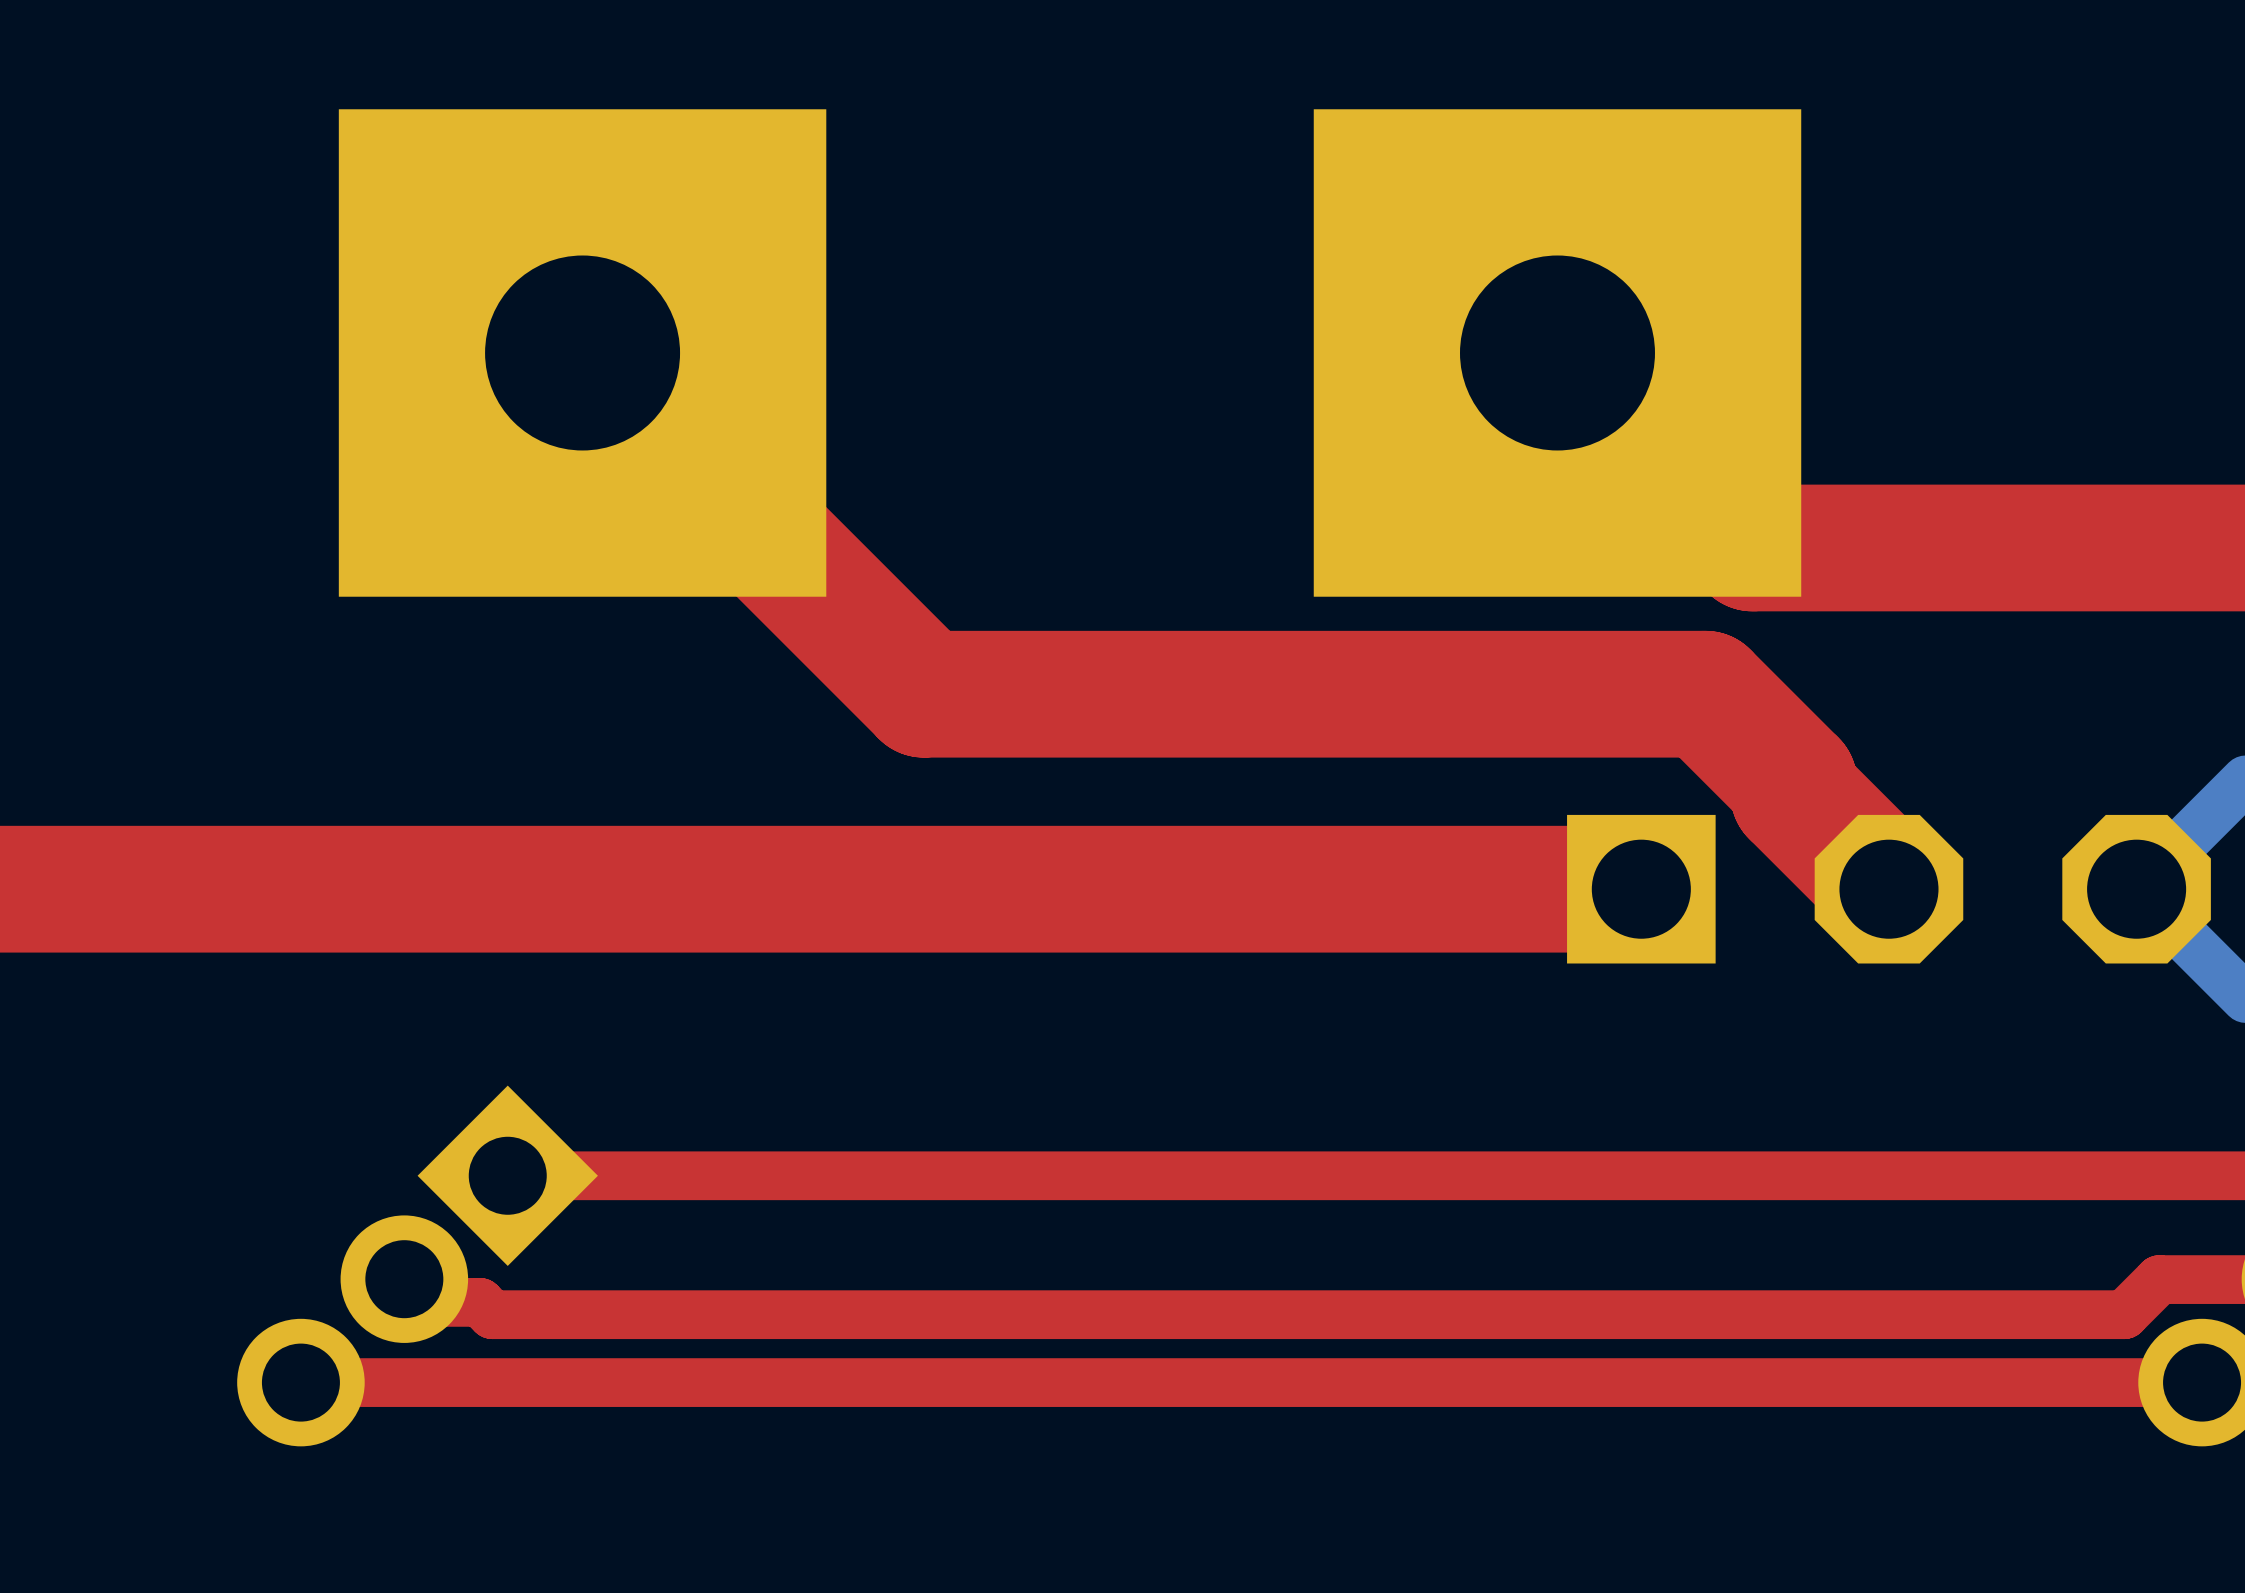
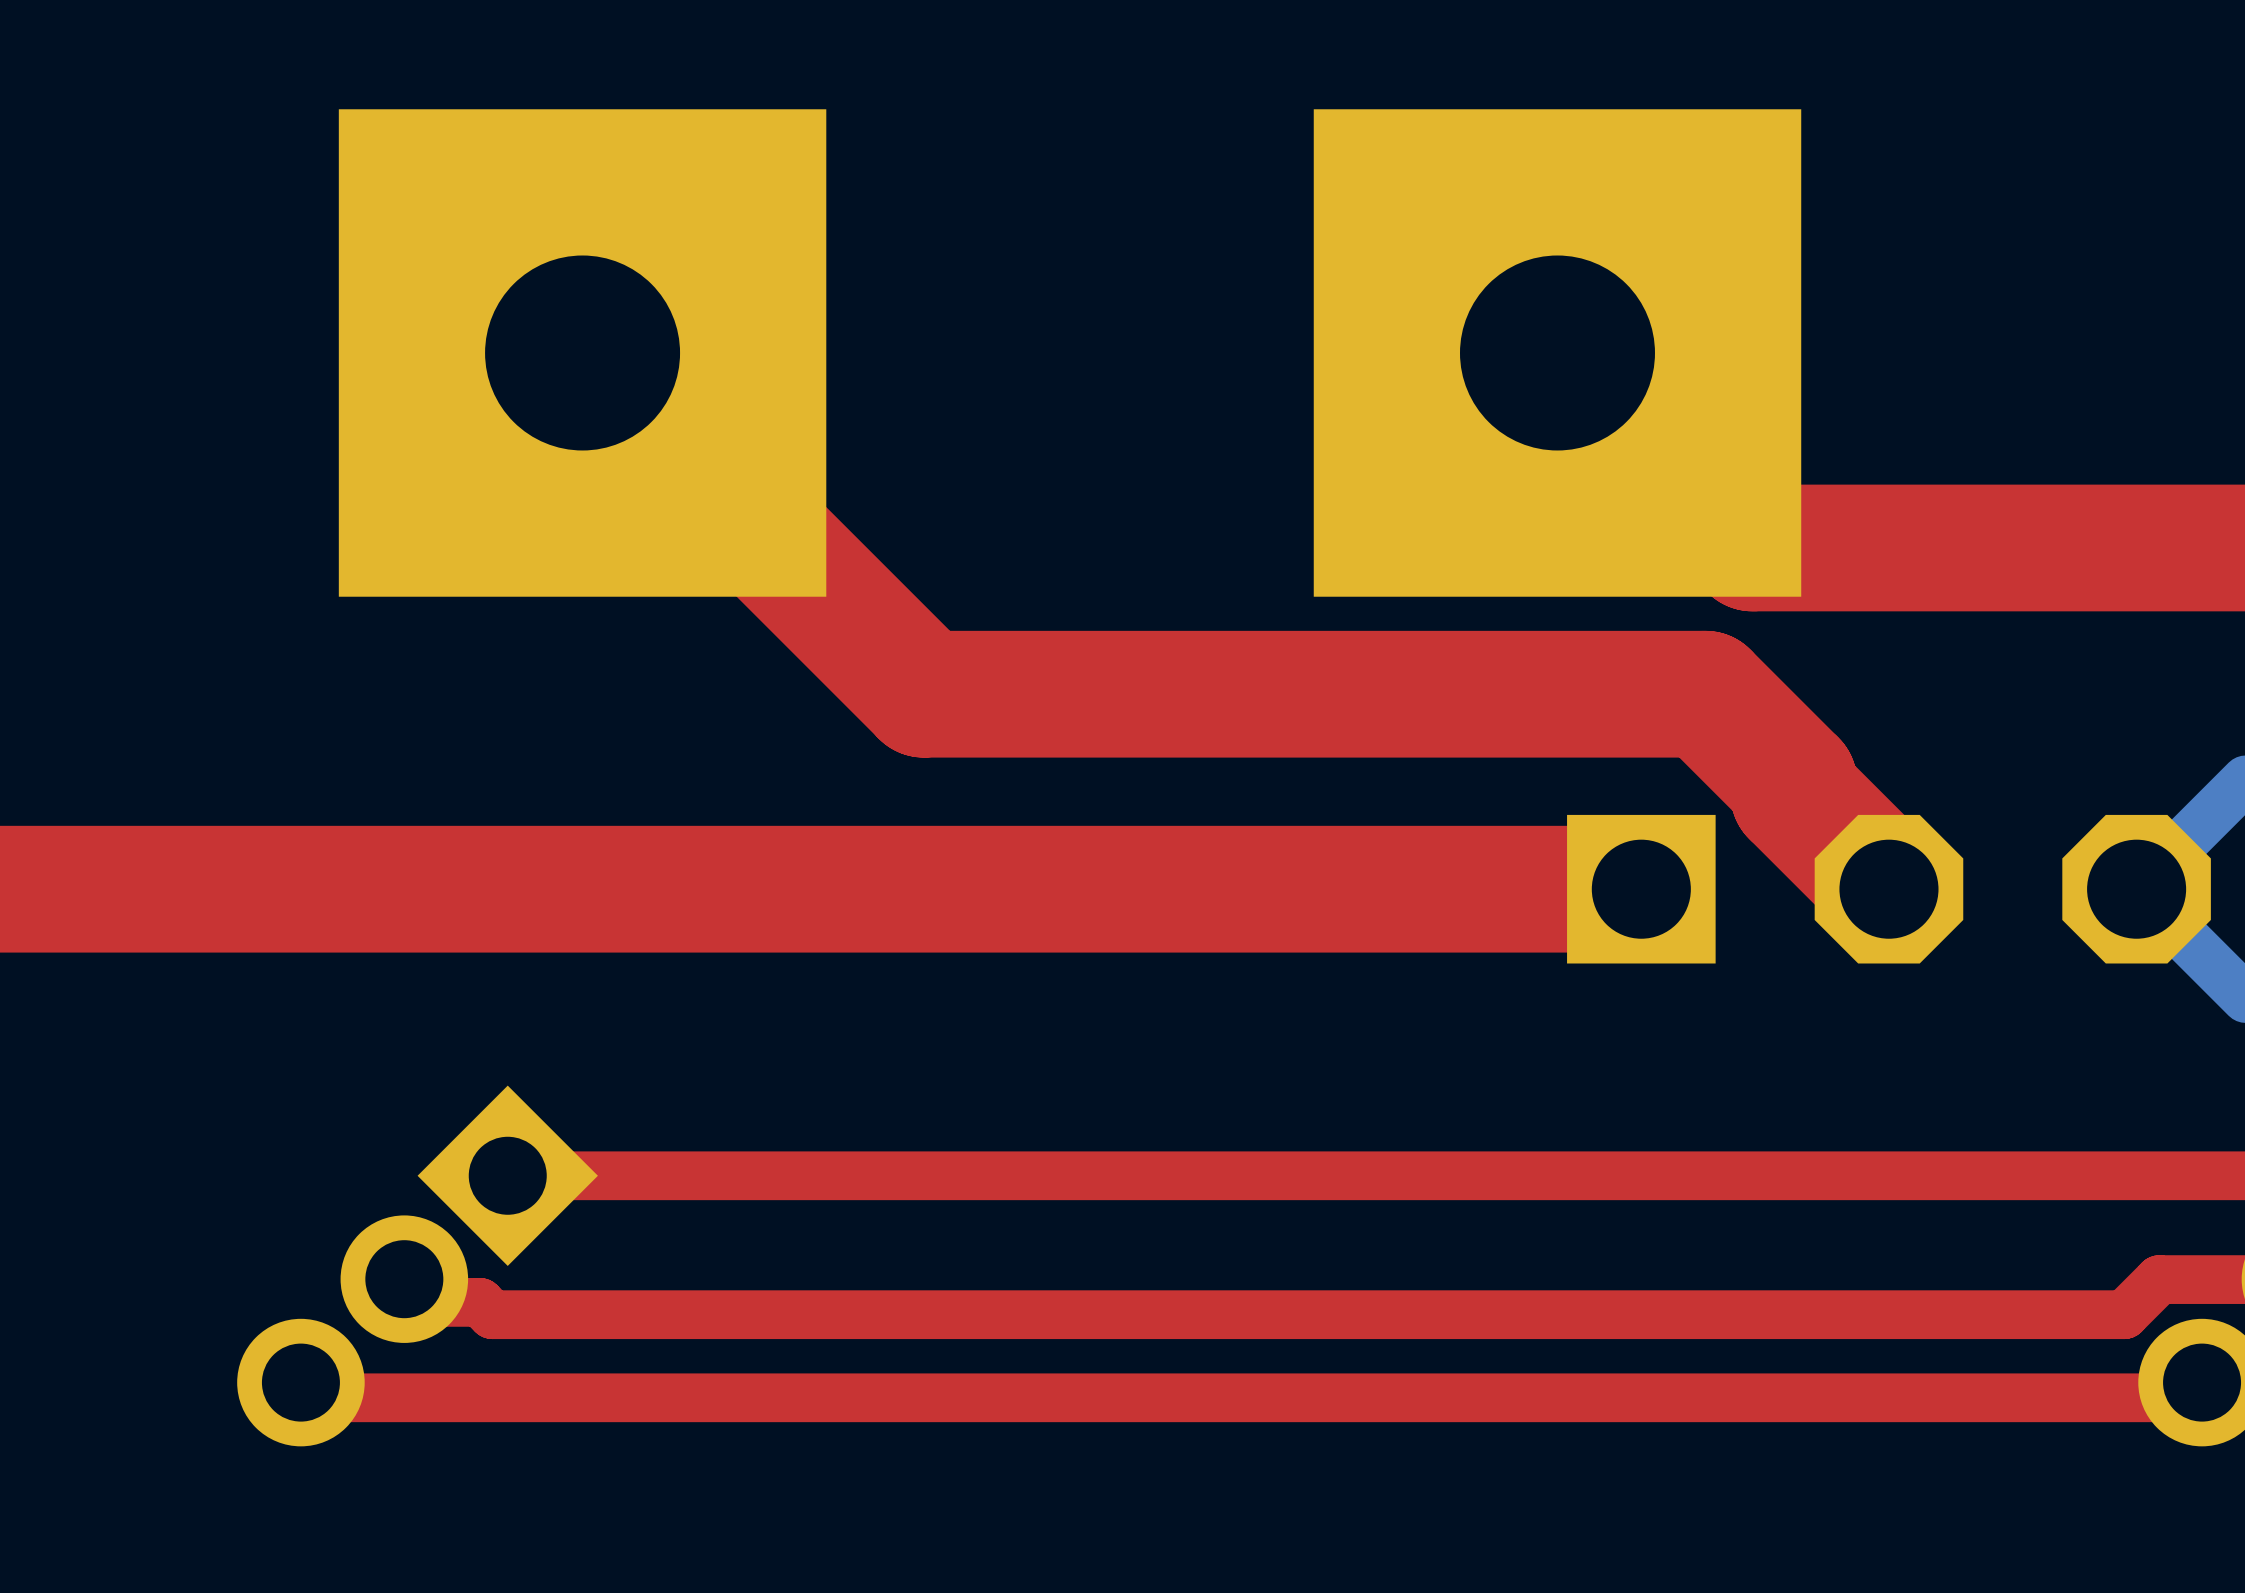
top track: (2202, 1382) (300, 1382) -> (2202, 1382) (2197, 1397) (321, 1397) (300, 1382)

